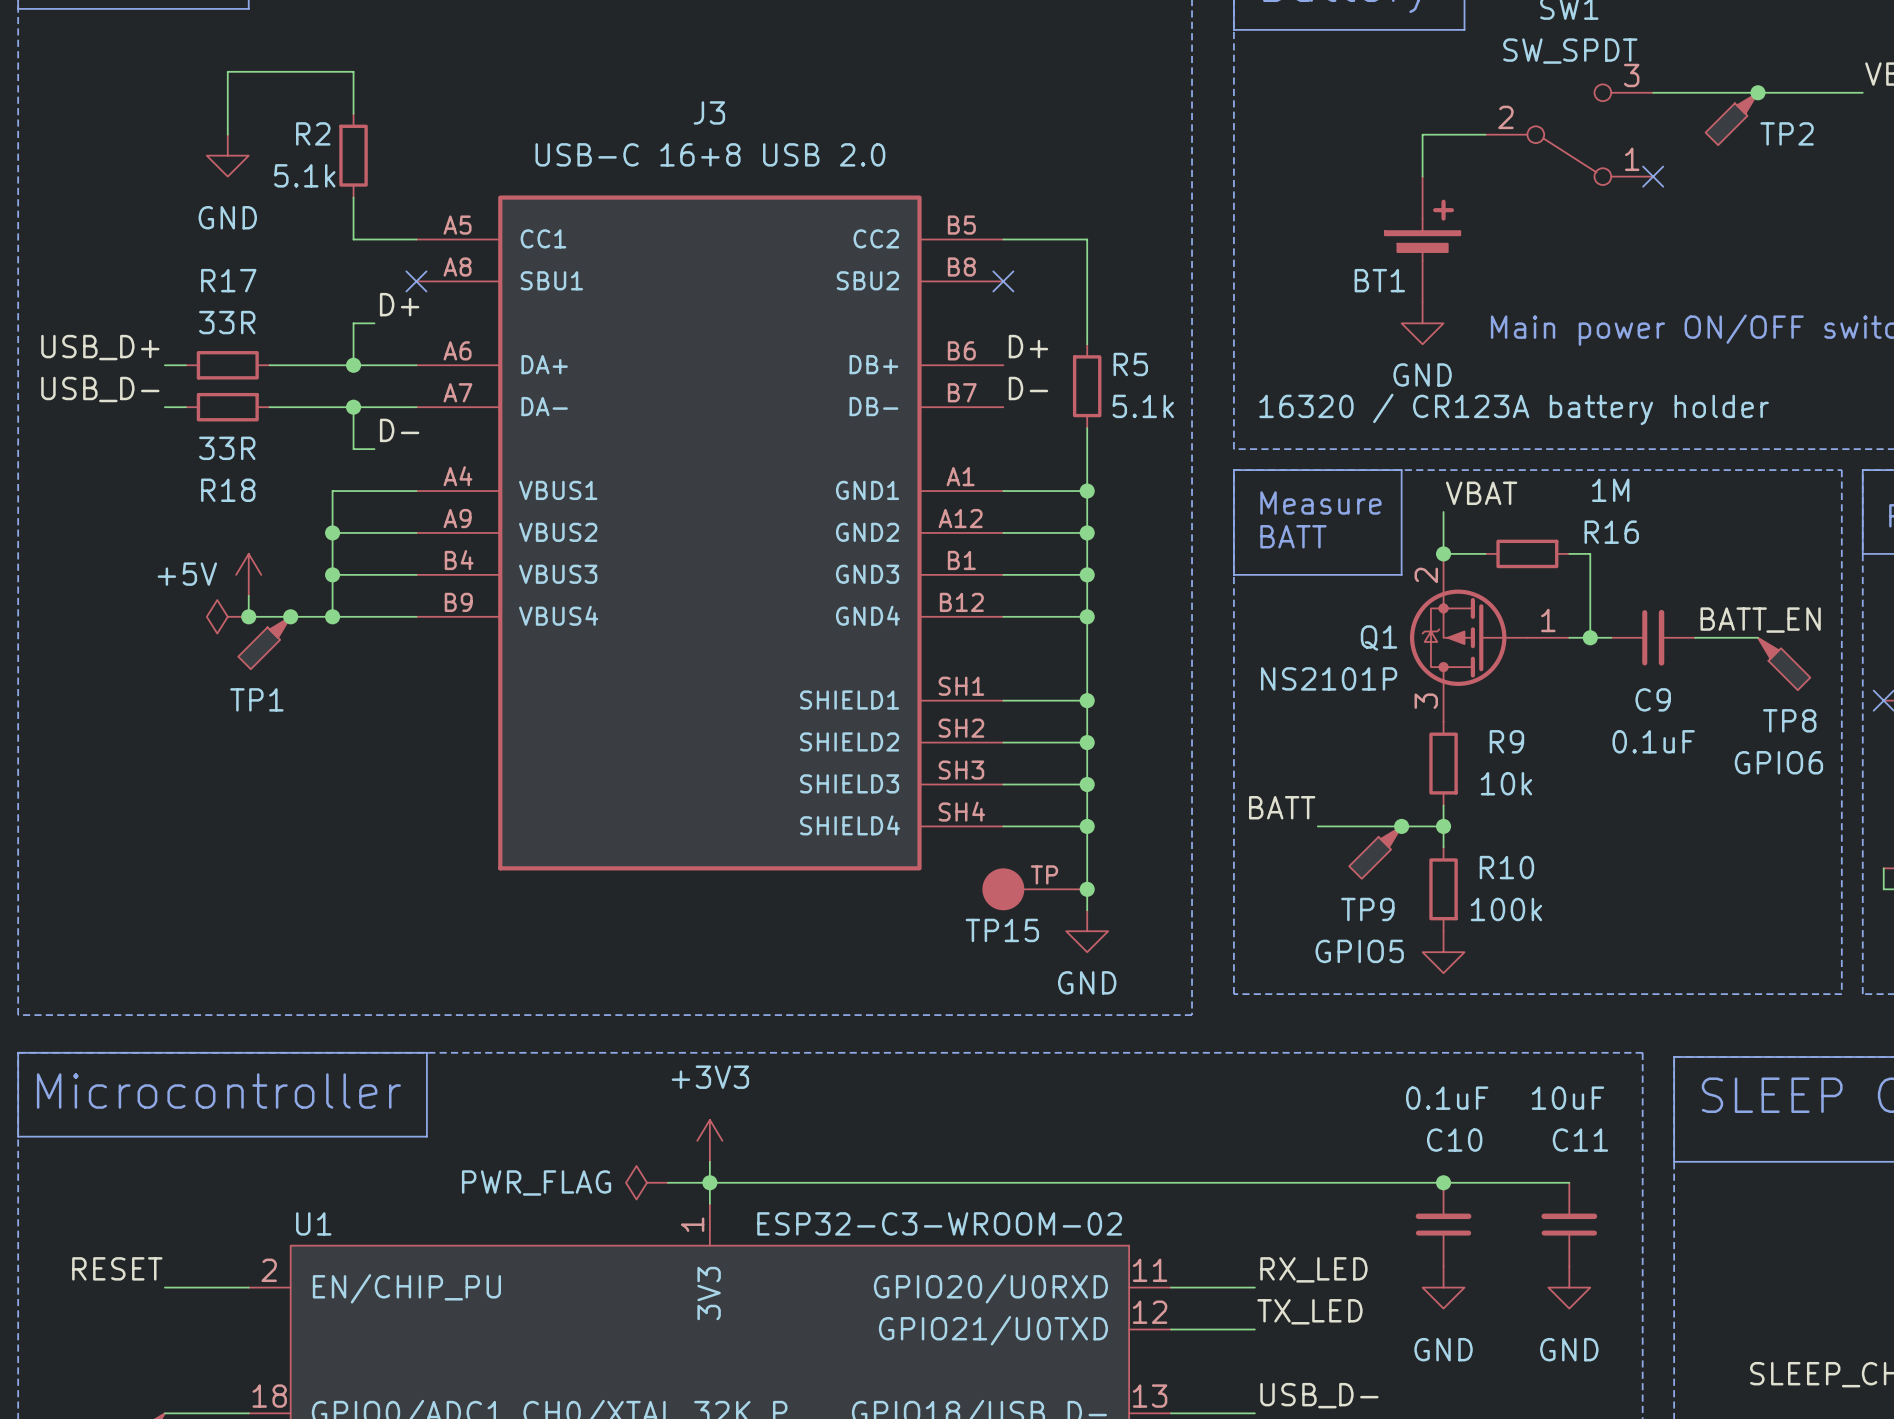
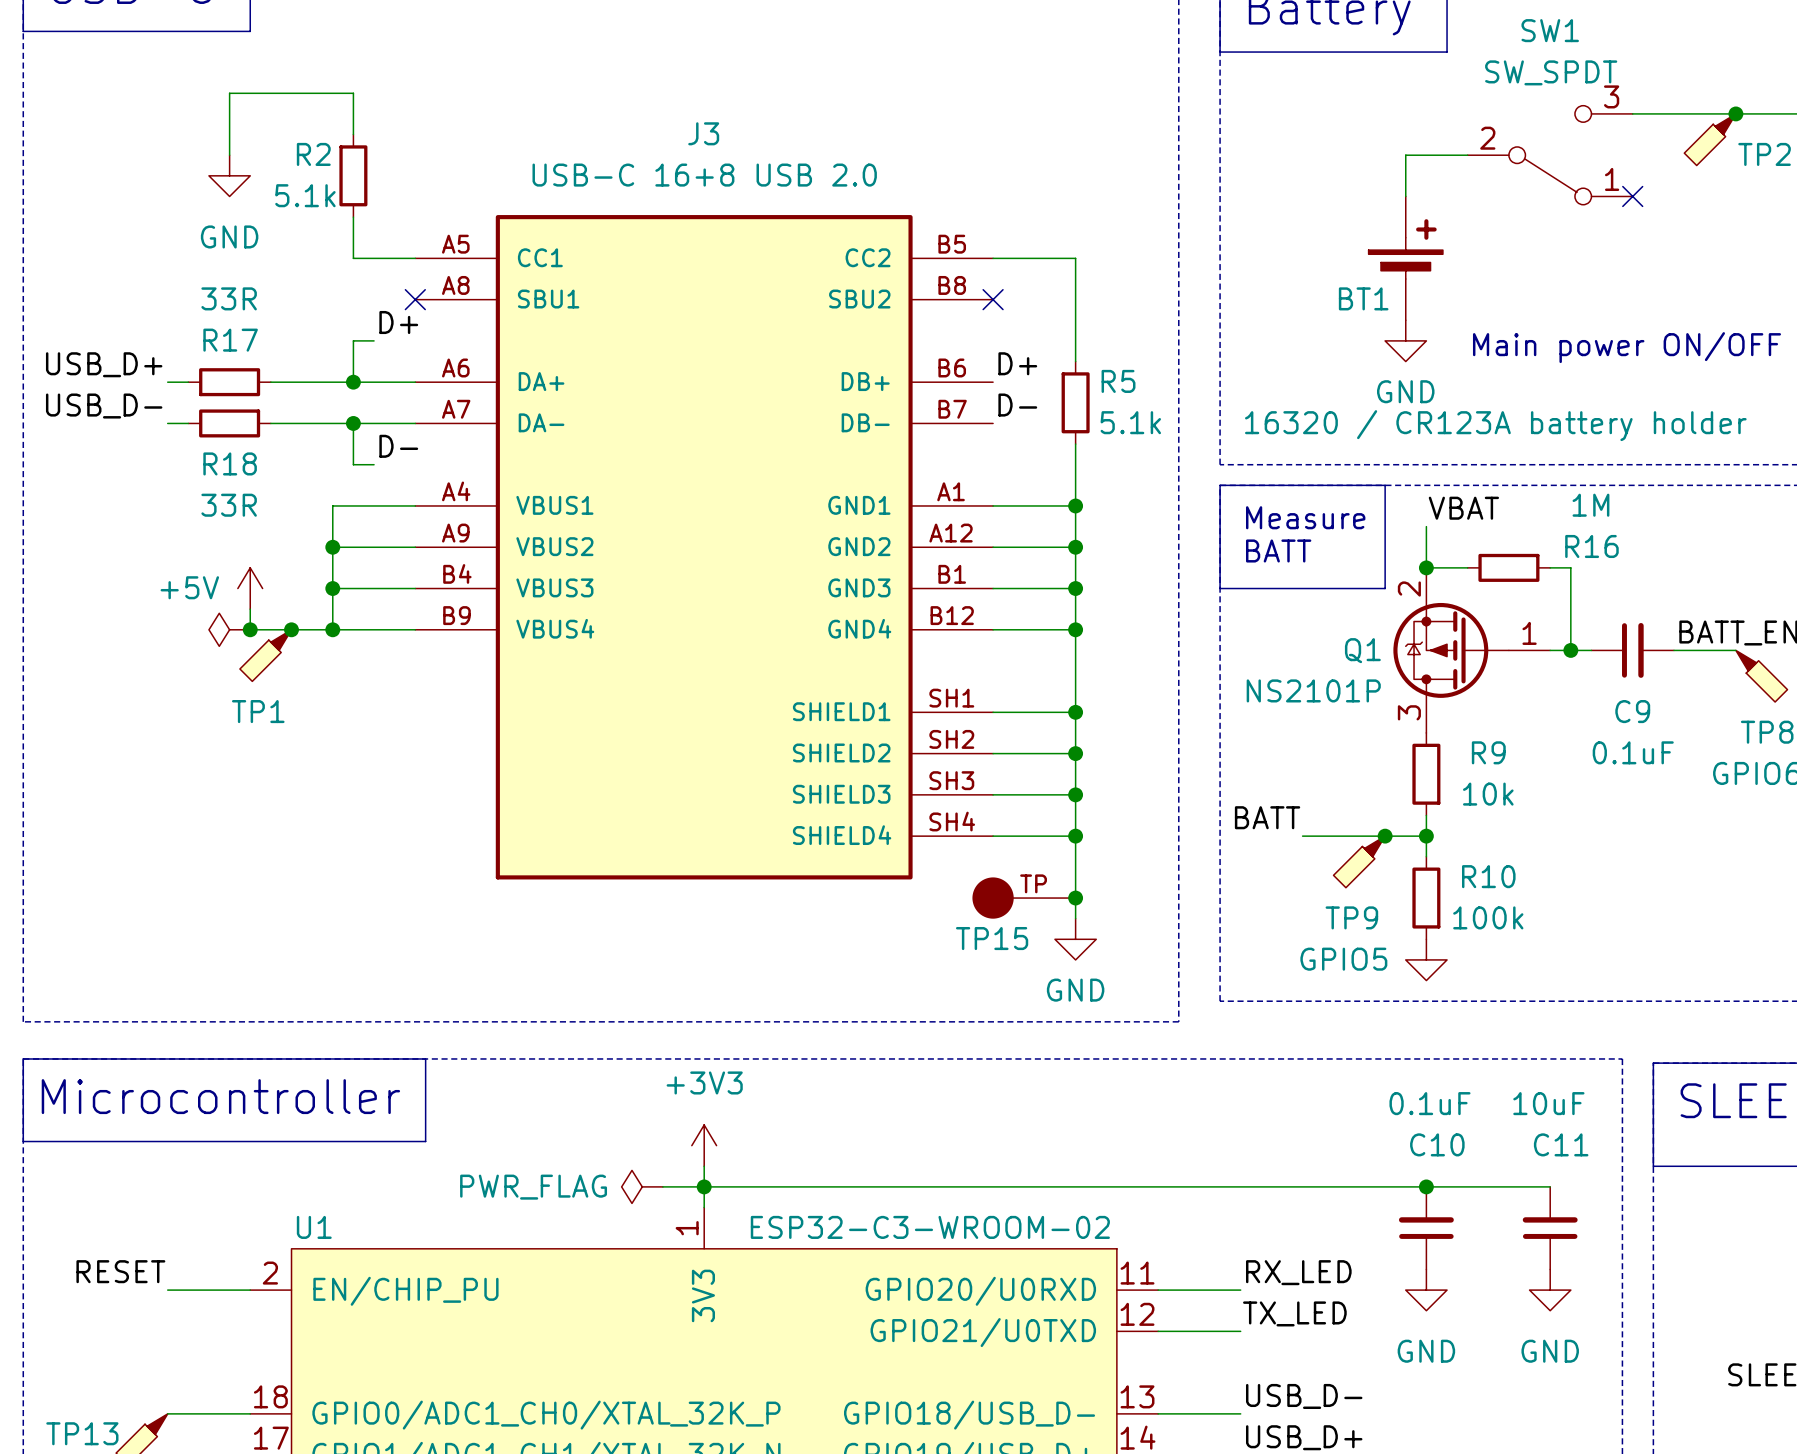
R17 name position: R17 (228, 280) -> R17 (230, 340)
R17 value position: 33R (227, 322) -> 33R (229, 298)
R18 value position: 33R (227, 448) -> 33R (229, 505)
R18 name position: R18 (228, 490) -> R18 (230, 463)

